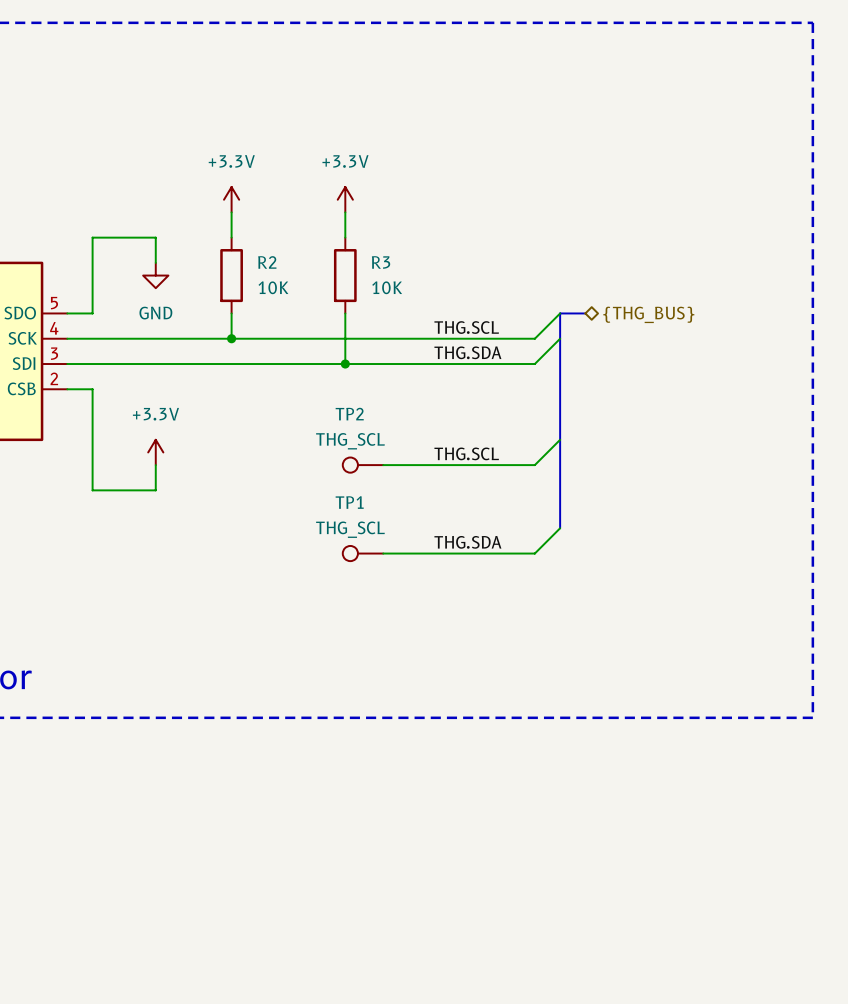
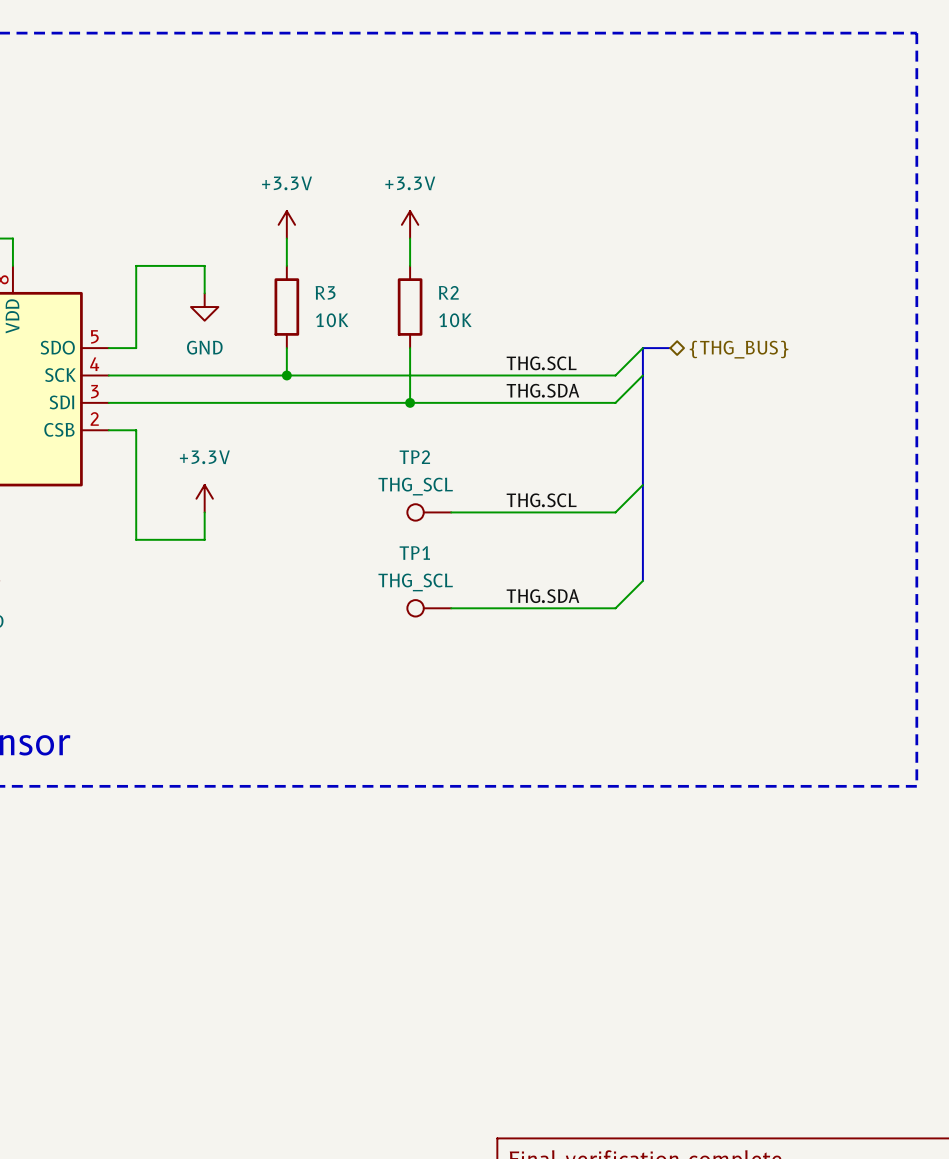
R2 name: R2 (267, 262) -> R3 (325, 292)
R3 name: R3 (381, 262) -> R2 (448, 292)

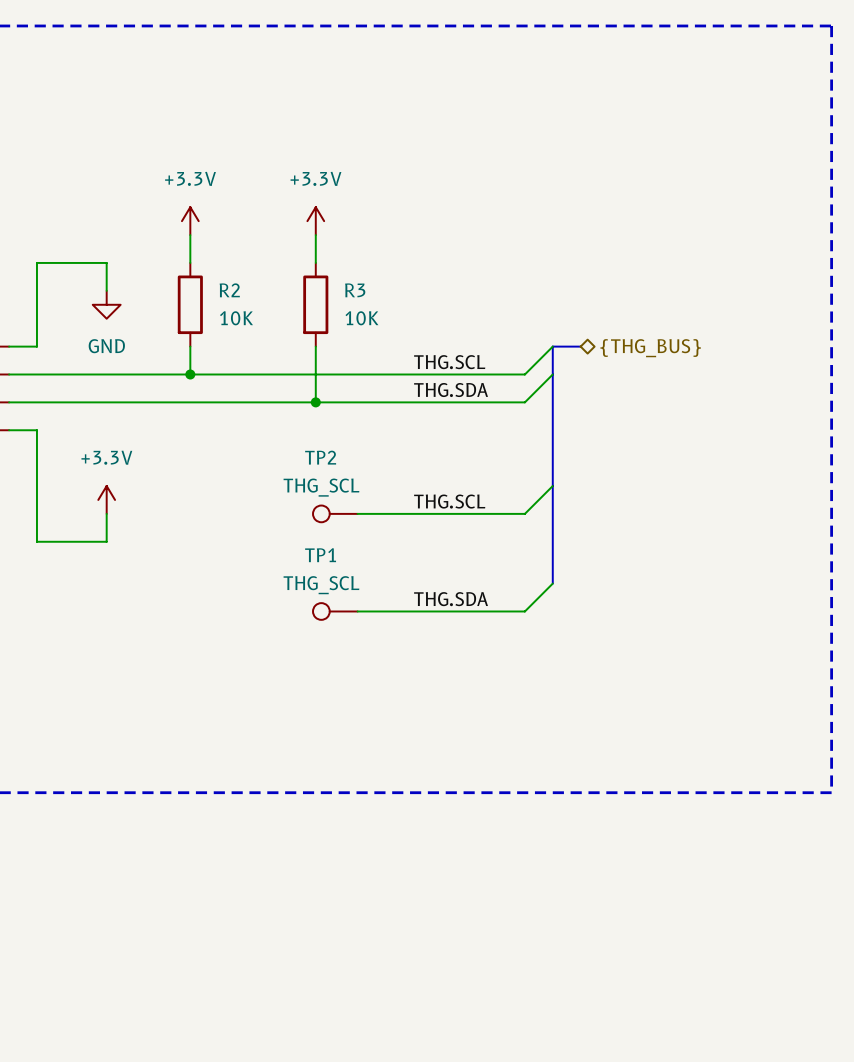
R3 name: R3 (325, 292) -> R2 (229, 290)
R2 name: R2 (448, 292) -> R3 (355, 290)

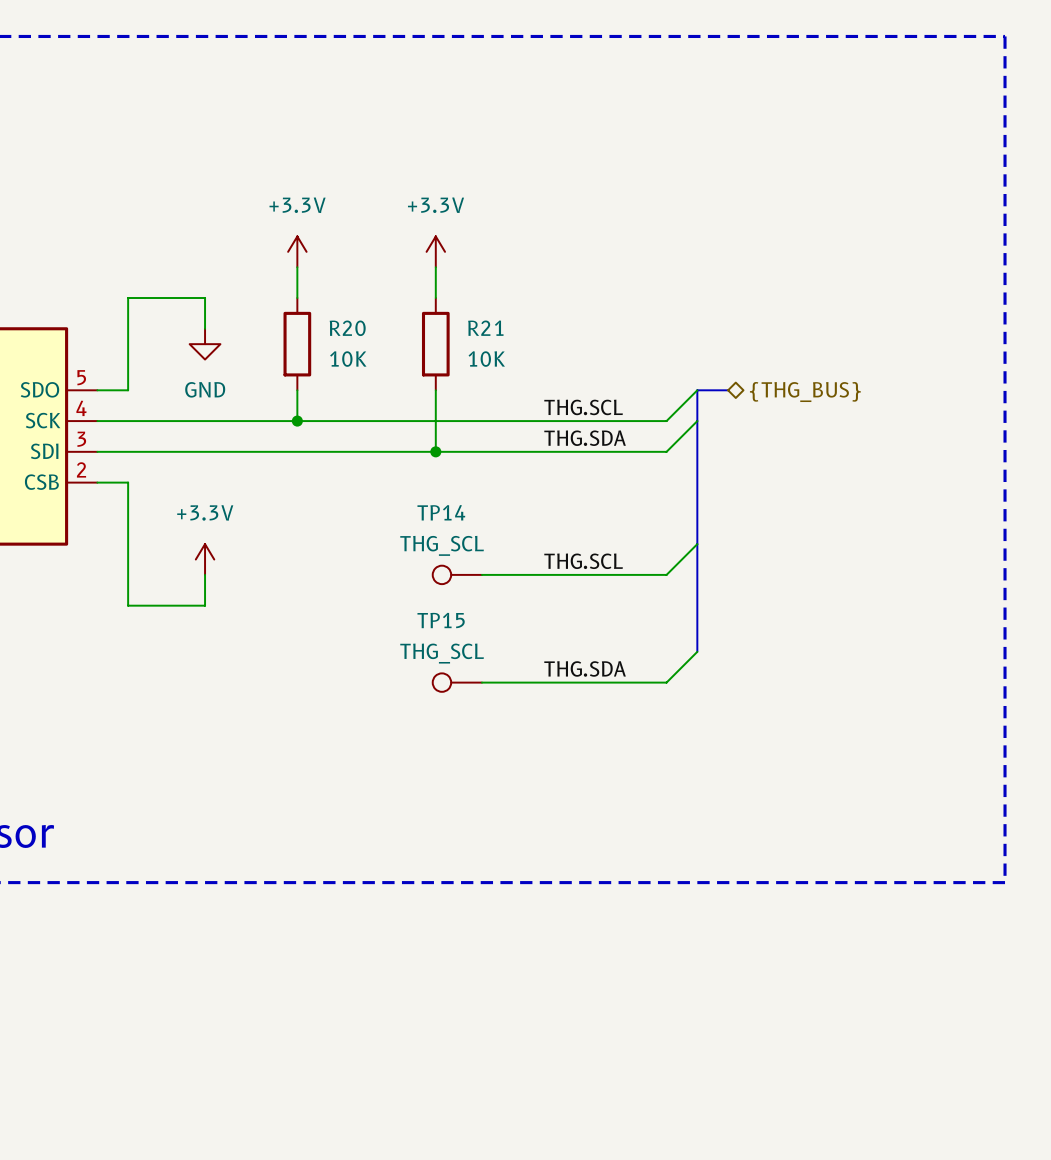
R2 name: R2 (229, 290) -> R20 (347, 328)
R3 name: R3 (355, 290) -> R21 (485, 328)
TP2 name: TP2 (320, 457) -> TP14 (441, 512)
TP1 name: TP1 (320, 555) -> TP15 (441, 620)

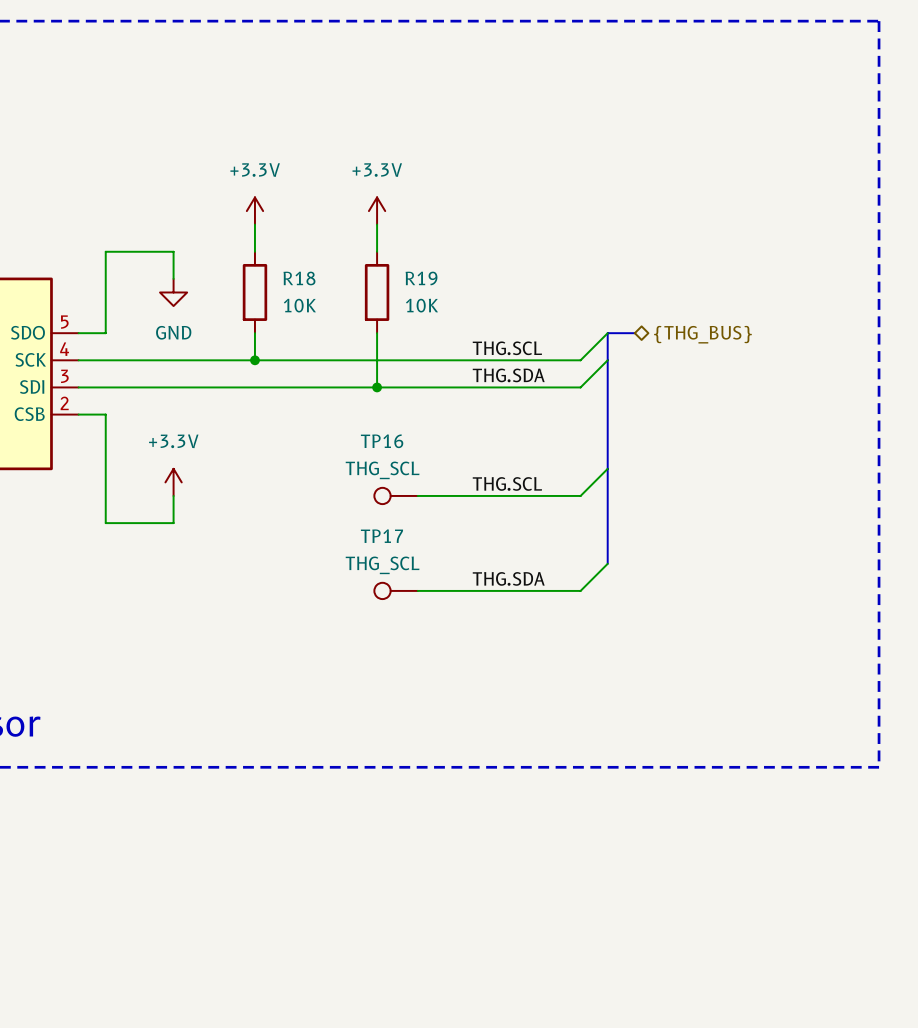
R20 name: R20 (347, 328) -> R18 (299, 278)
R21 name: R21 (485, 328) -> R19 (421, 278)
TP14 name: TP14 (441, 512) -> TP16 (382, 441)
TP15 name: TP15 (441, 620) -> TP17 (381, 536)

